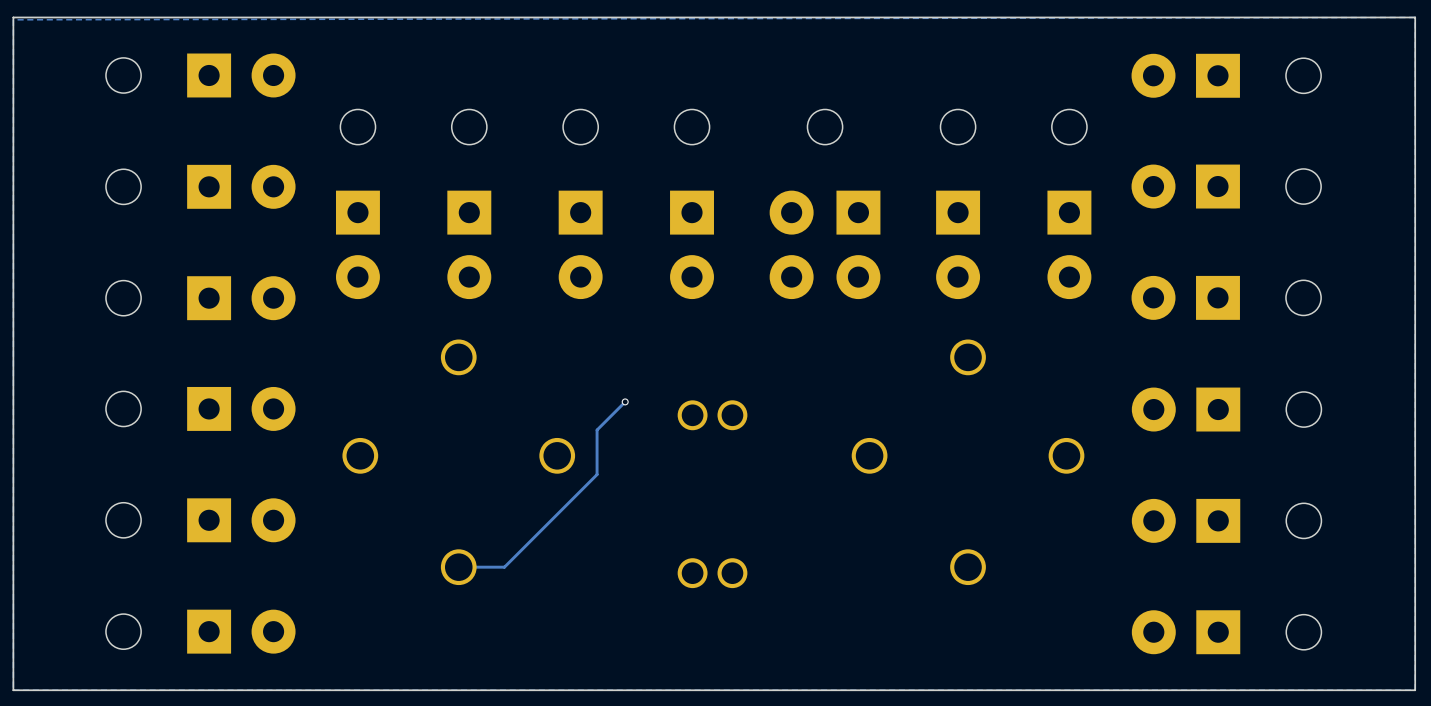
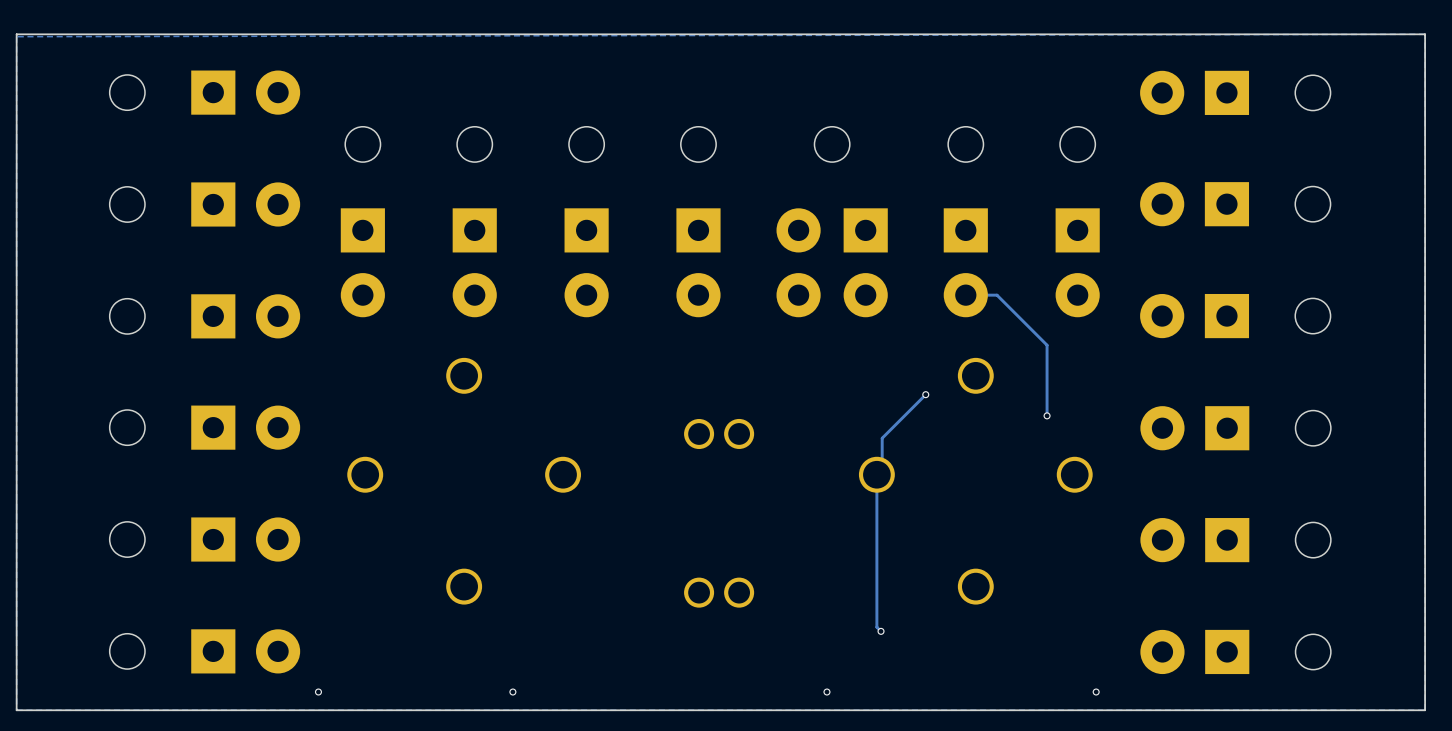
track: none -> (965, 295) (997, 295) (1047, 345) (1047, 415)
track: none -> (925, 394) (882, 438) (882, 469) (876, 474) (876, 627) (881, 631)
via: none -> (925, 394)
via: none -> (1047, 415)
track: (625, 401) (597, 430) (597, 474) (504, 567) (458, 567) -> none
via: (625, 401) -> none
via: none -> (881, 631)
via: none -> (318, 692)
via: none -> (512, 692)
via: none -> (826, 692)
via: none -> (1096, 692)

